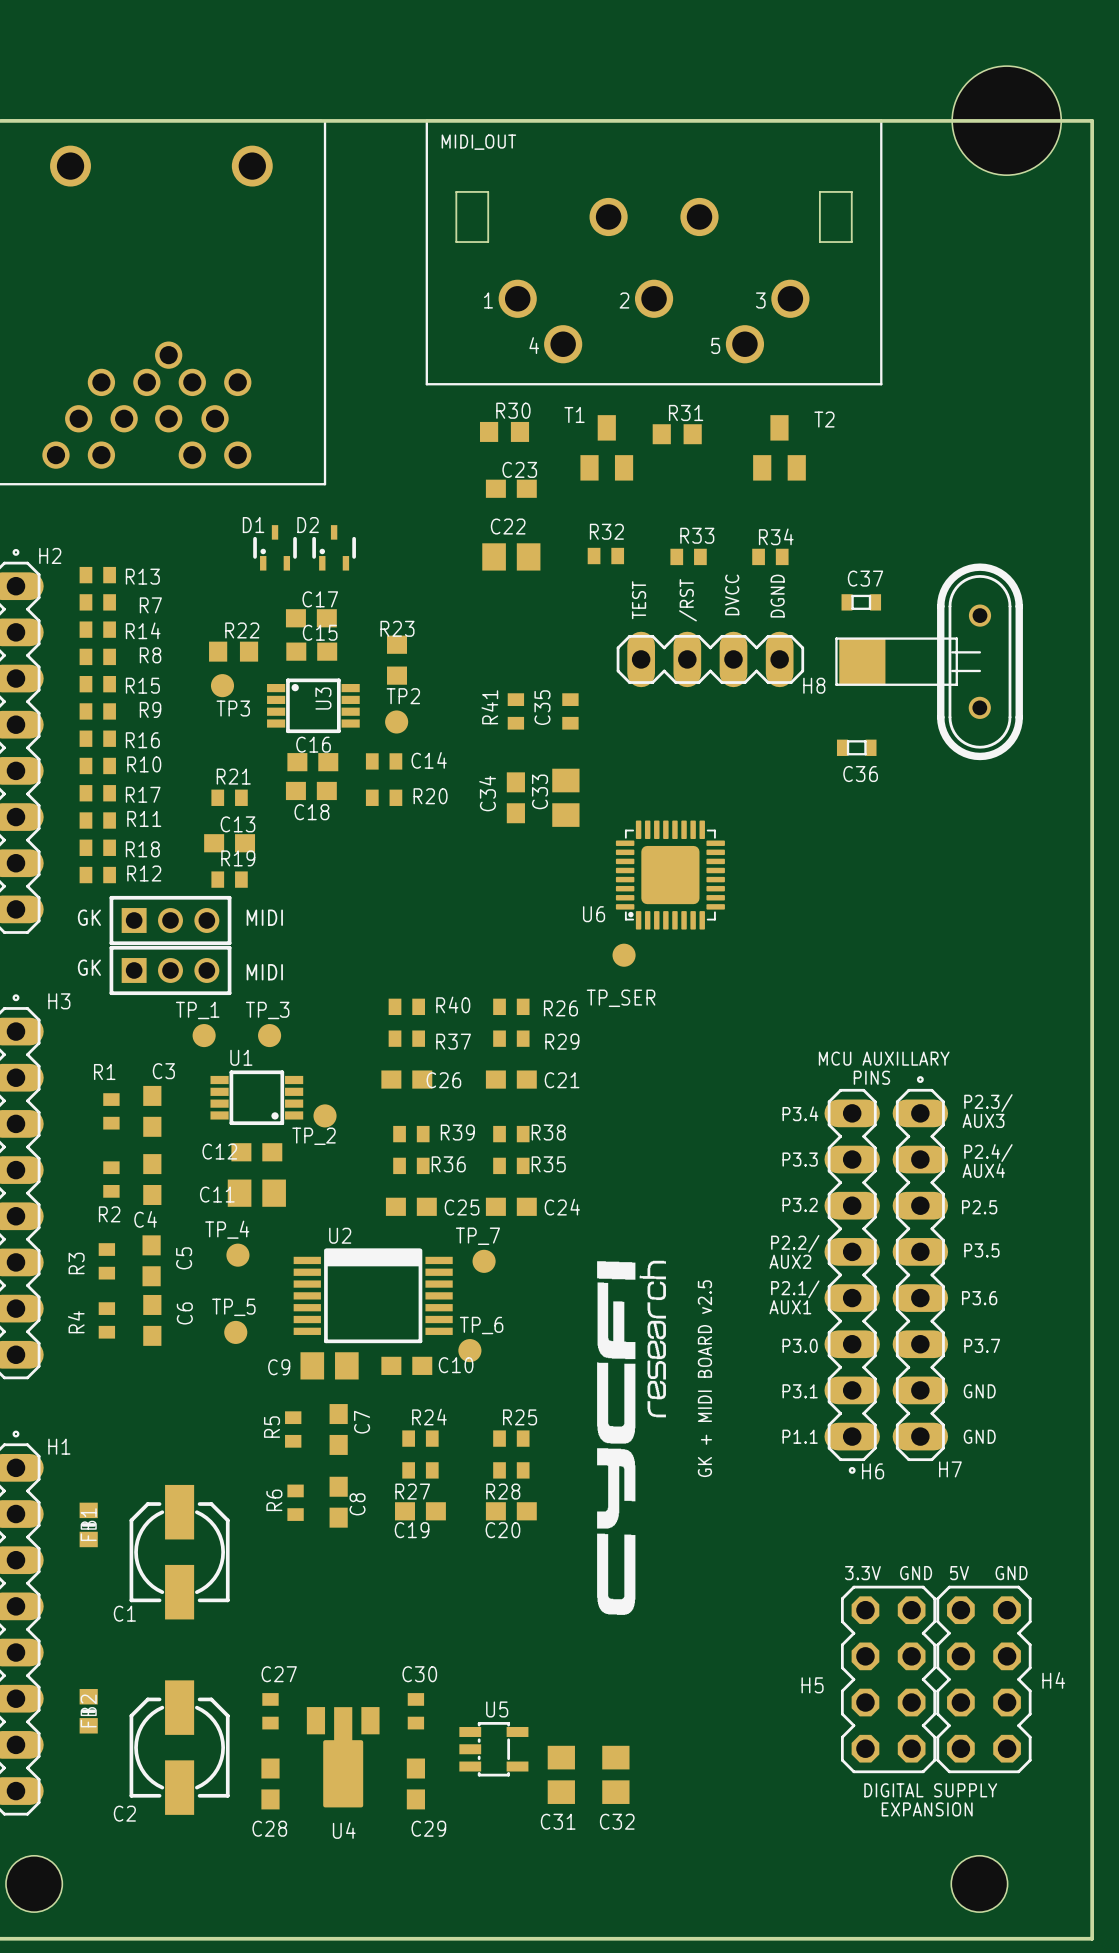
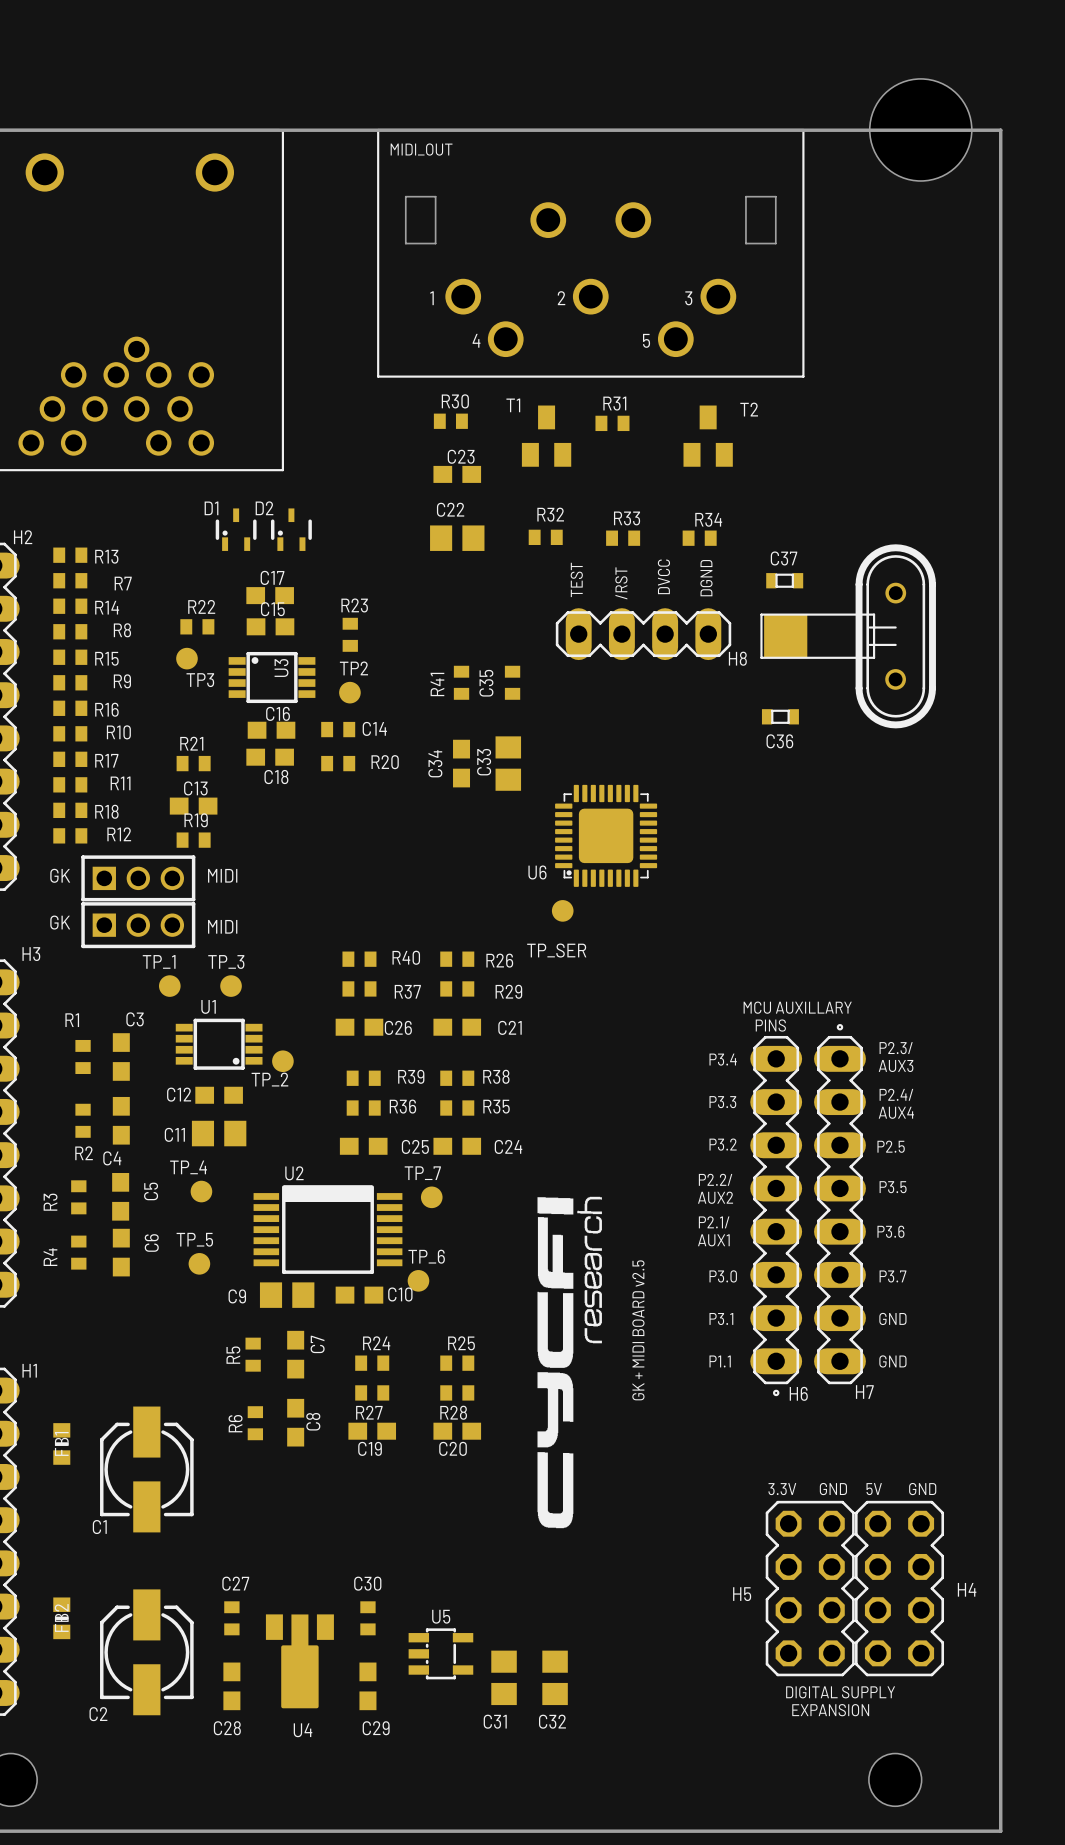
R30 footprint: [479, 421, 530, 442] -> [433, 413, 468, 429]
R31 footprint: [652, 424, 702, 445] -> [595, 415, 630, 432]
R23 footprint: [387, 635, 408, 685] -> [342, 617, 358, 652]
R22 footprint: [209, 641, 259, 662] -> [180, 619, 215, 635]

